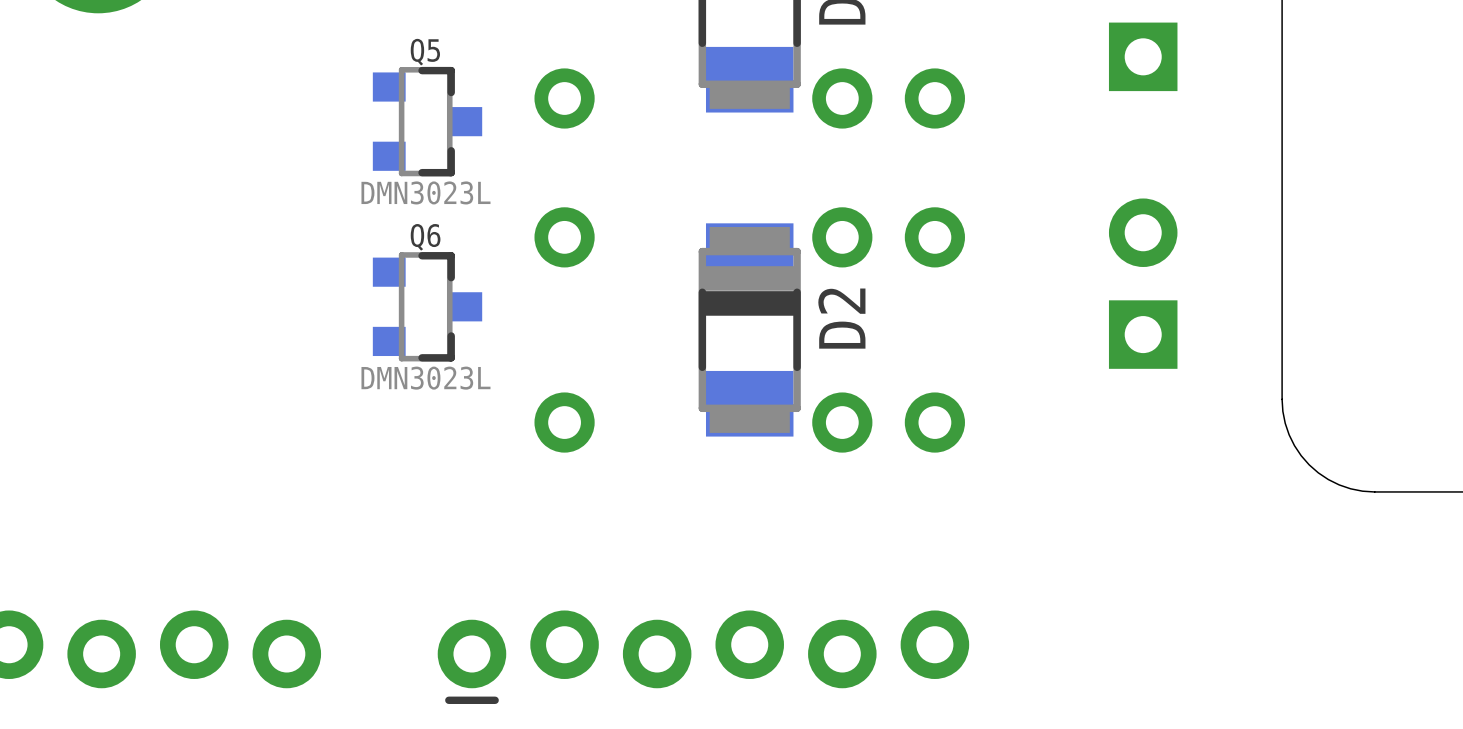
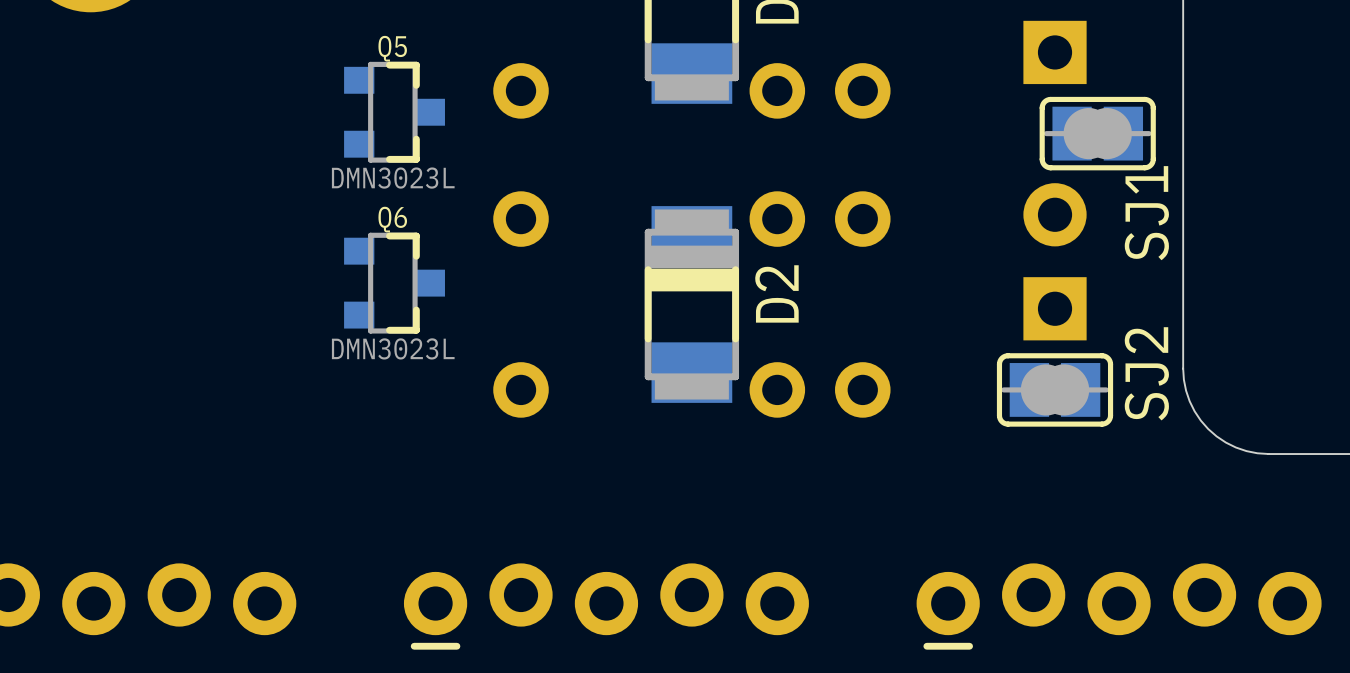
SJ1: none -> (1097, 133)
SJ2: none -> (1055, 389)
part: (703, 657) -> none
part: none -> (1119, 606)

